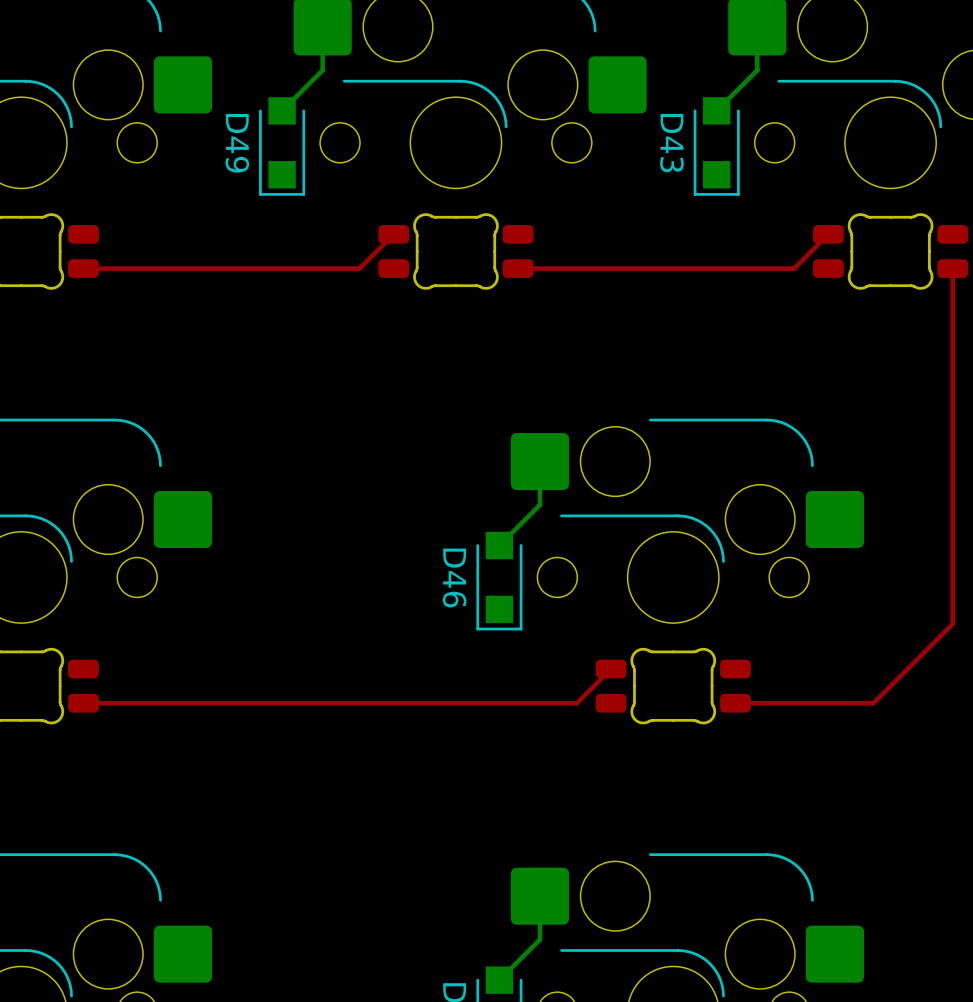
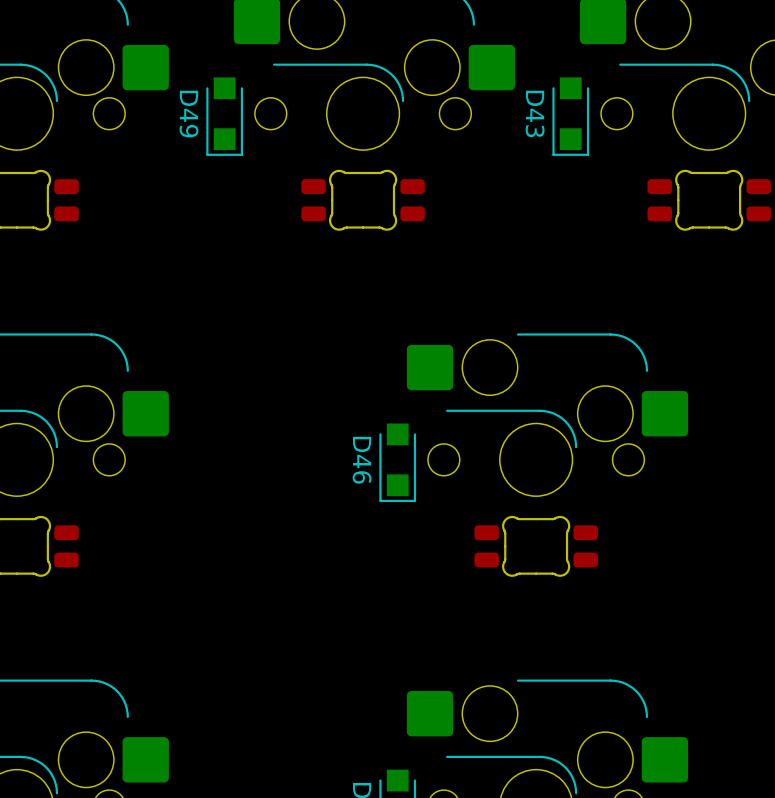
bottom track: (322, 26) (322, 70) (282, 110) -> none
bottom track: (757, 26) (757, 70) (716, 110) -> none
top track: (393, 234) (359, 268) (83, 268) -> none
top track: (828, 234) (794, 268) (518, 268) -> none
top track: (952, 268) (952, 623) (873, 703) (735, 703) -> none
bottom track: (539, 461) (539, 504) (499, 545) -> none
top track: (611, 669) (576, 703) (83, 703) -> none
bottom track: (539, 896) (539, 939) (499, 980) -> none

